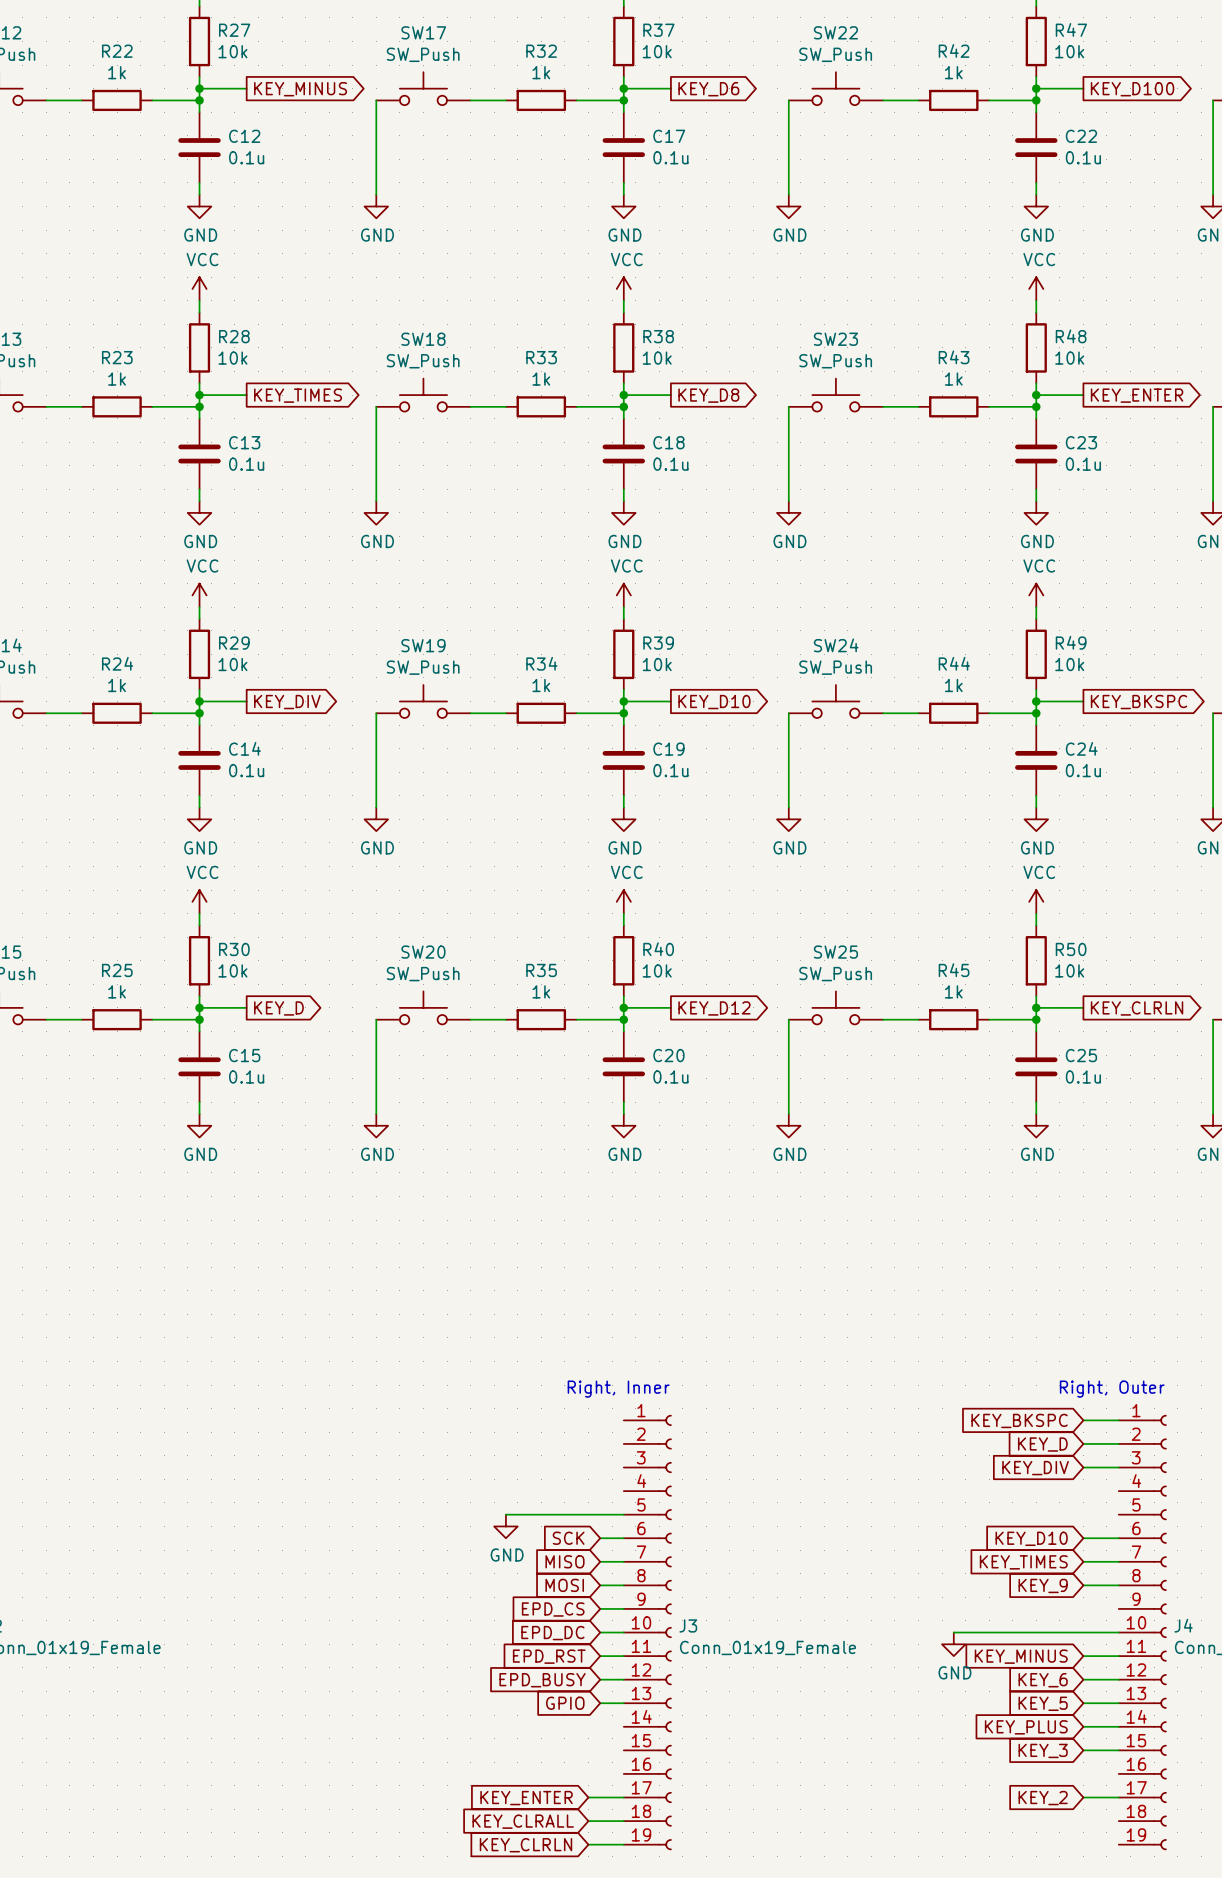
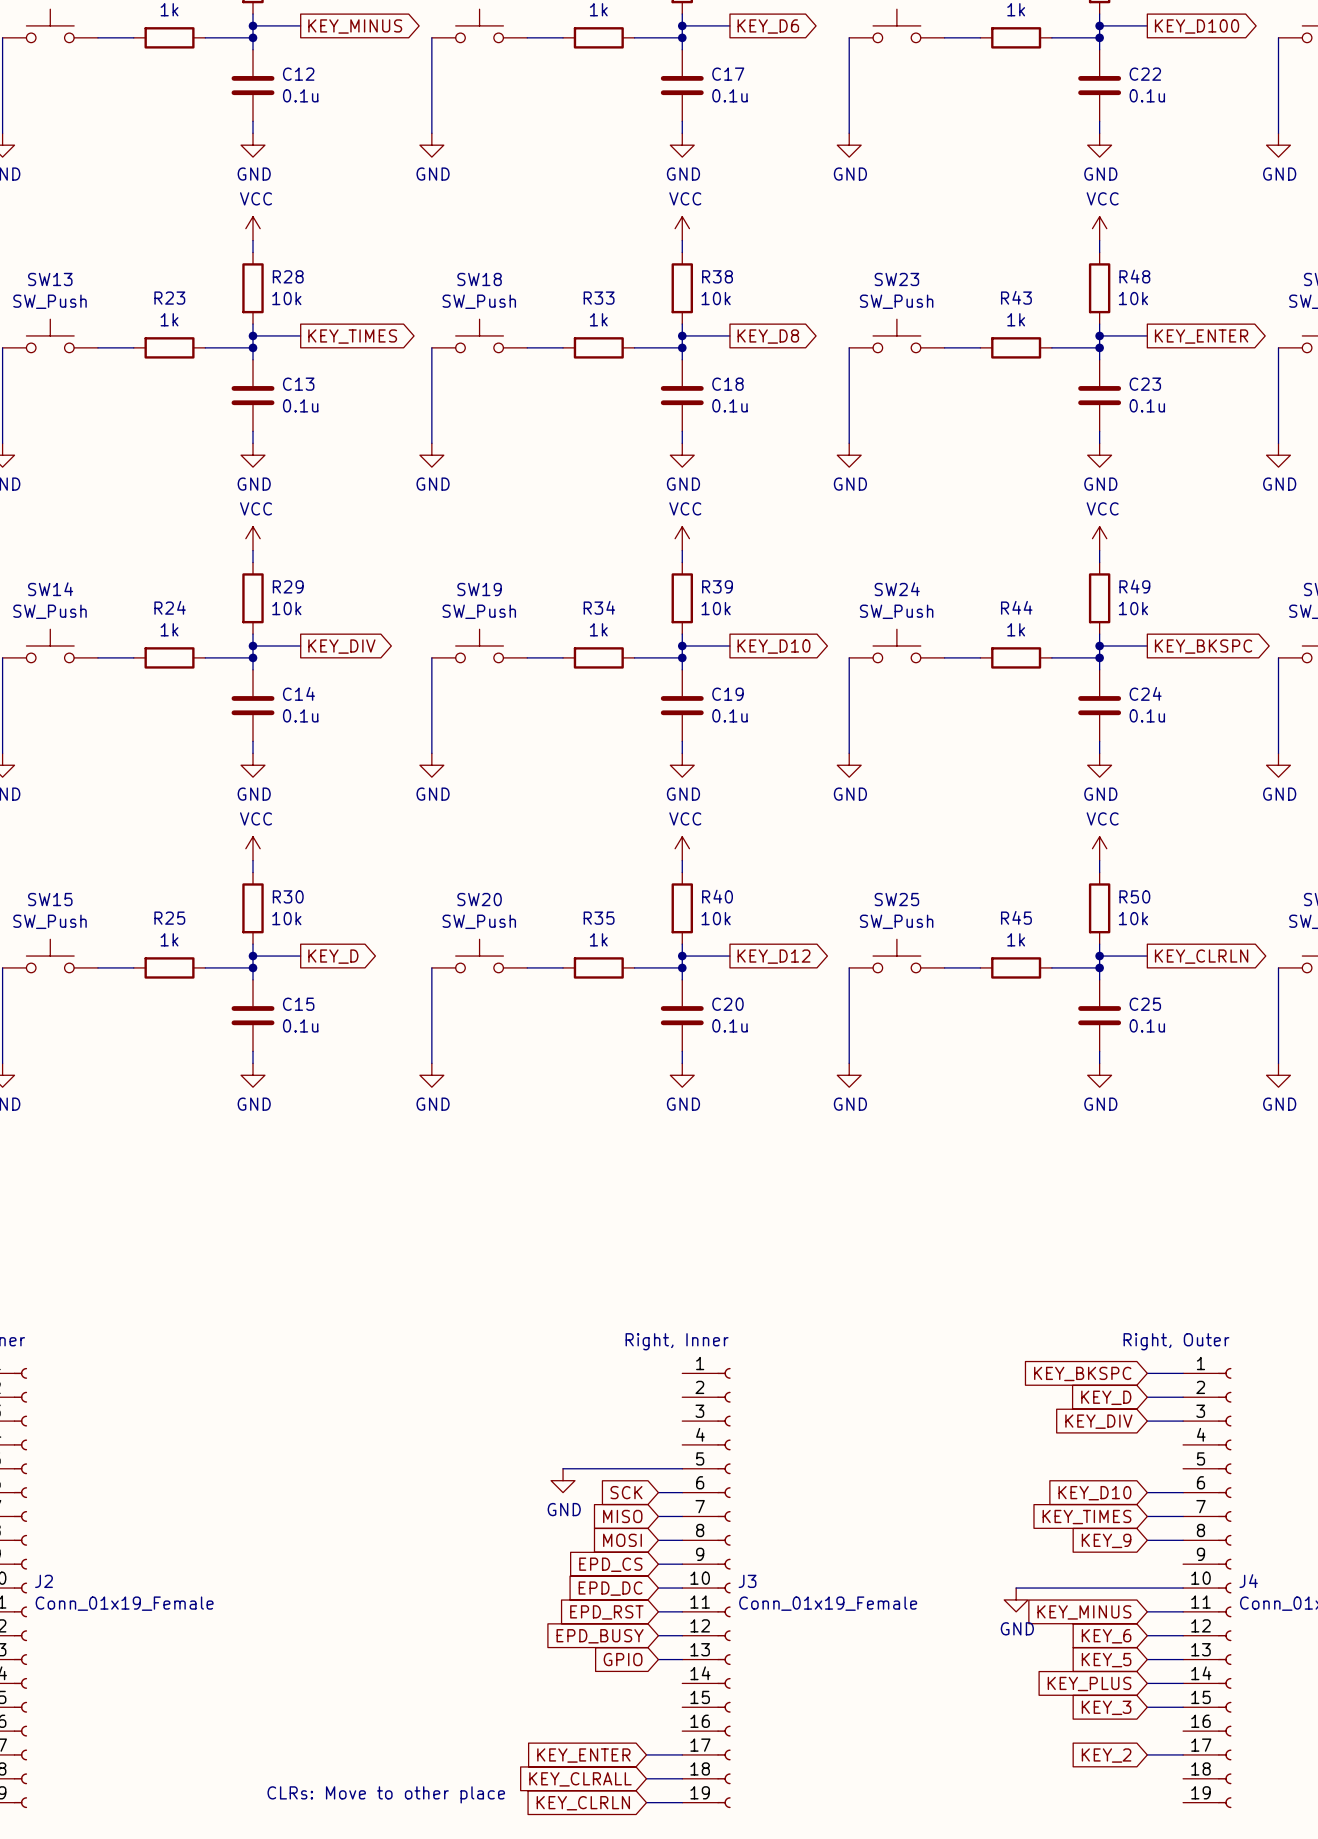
text: none -> CLRs: Move to other place (386, 1794)

